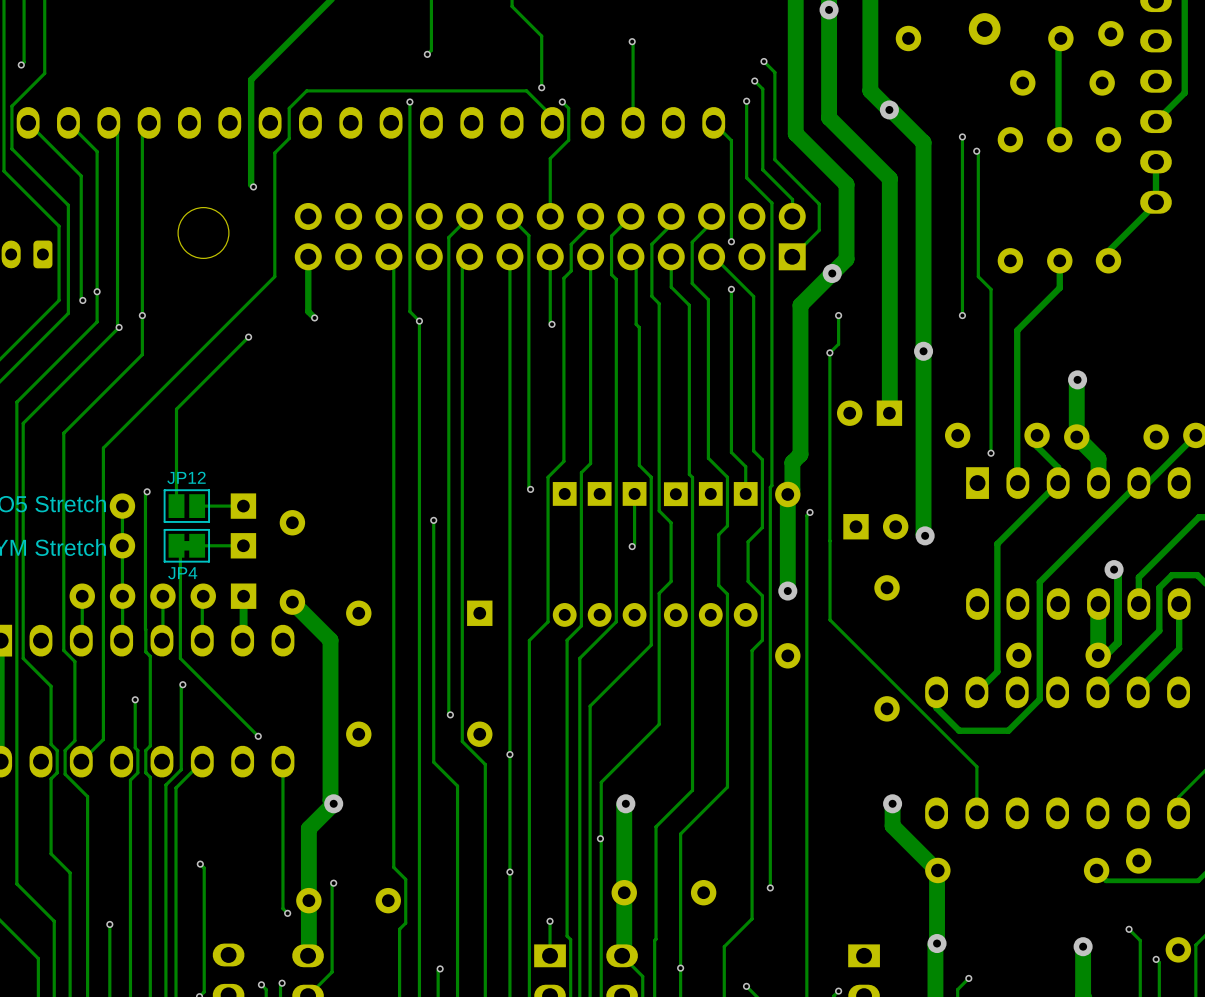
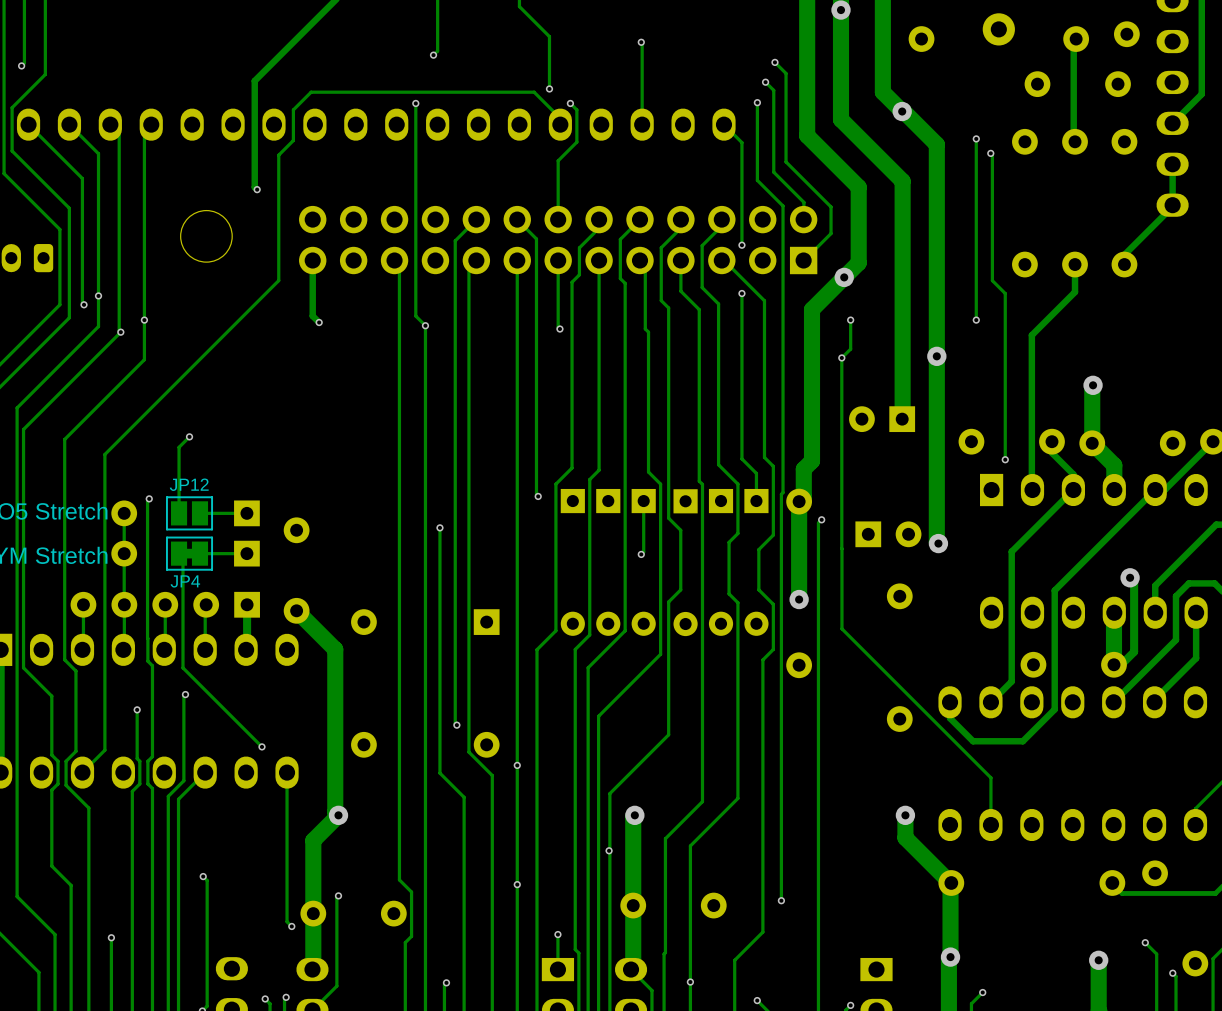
track: (248, 337) (176, 409) (176, 440) -> (189, 436) (179, 447)
via: (248, 337) -> none
via: none -> (189, 436)

